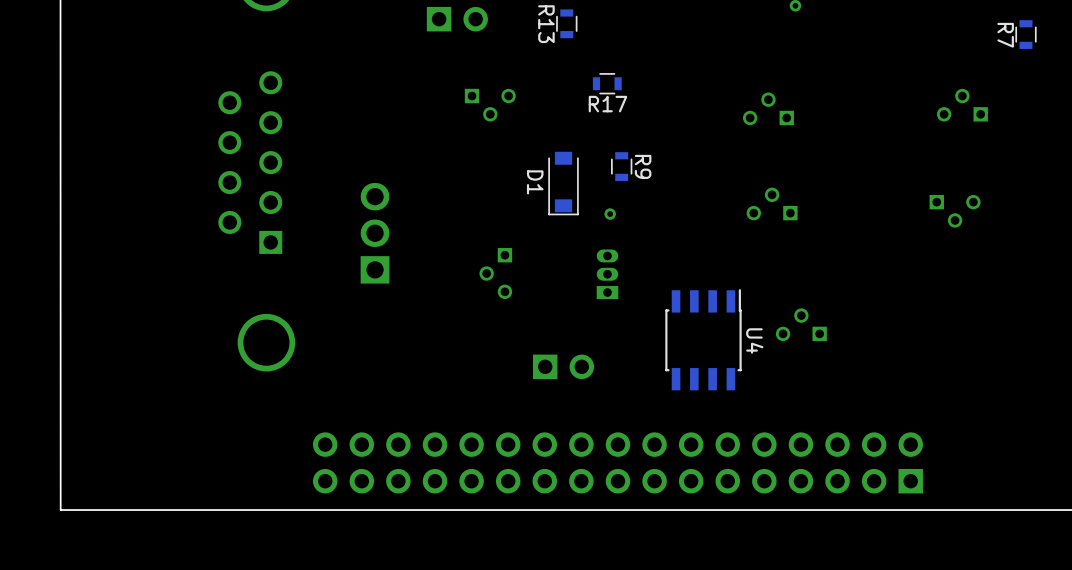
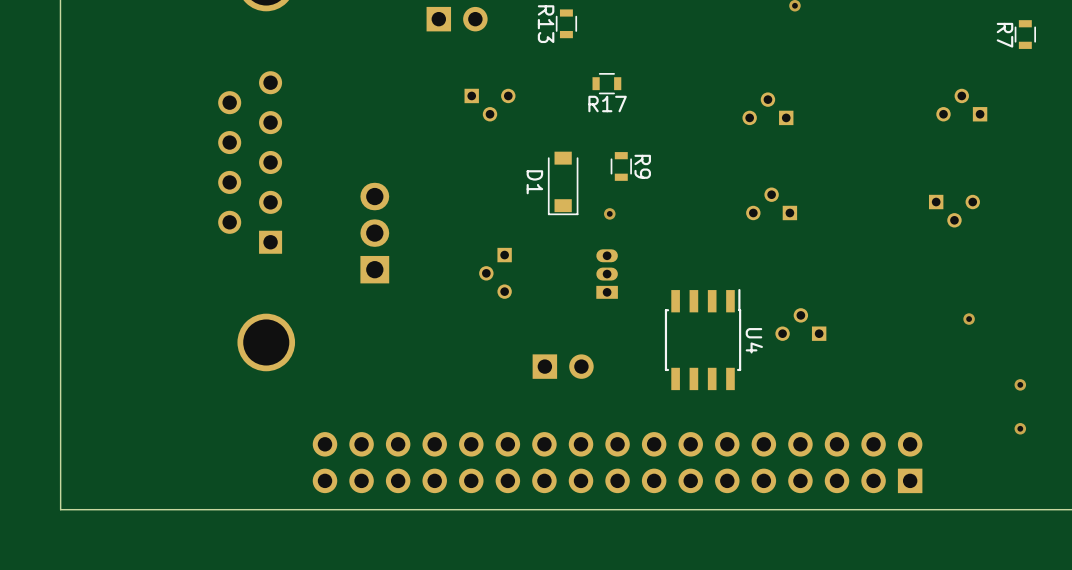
via: none -> (969, 319)
via: none -> (1020, 384)
via: none -> (1020, 428)

